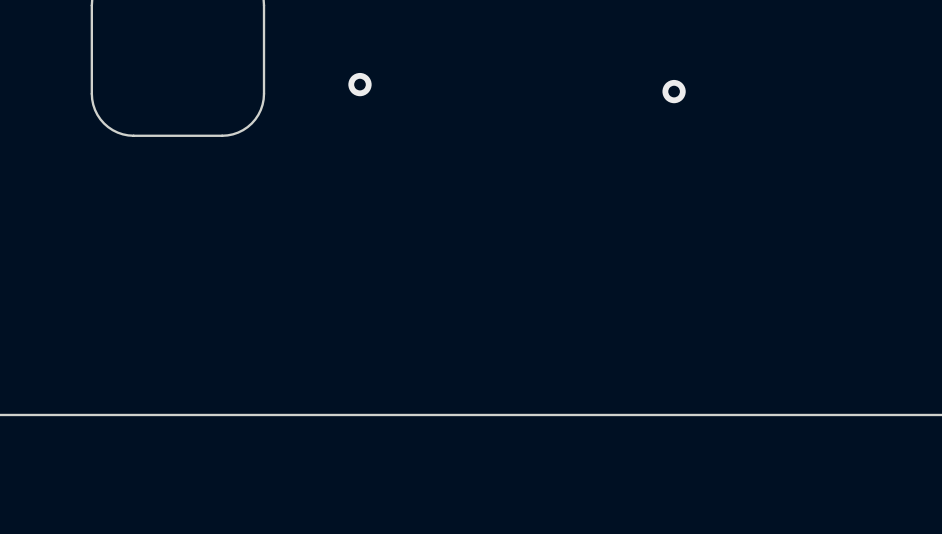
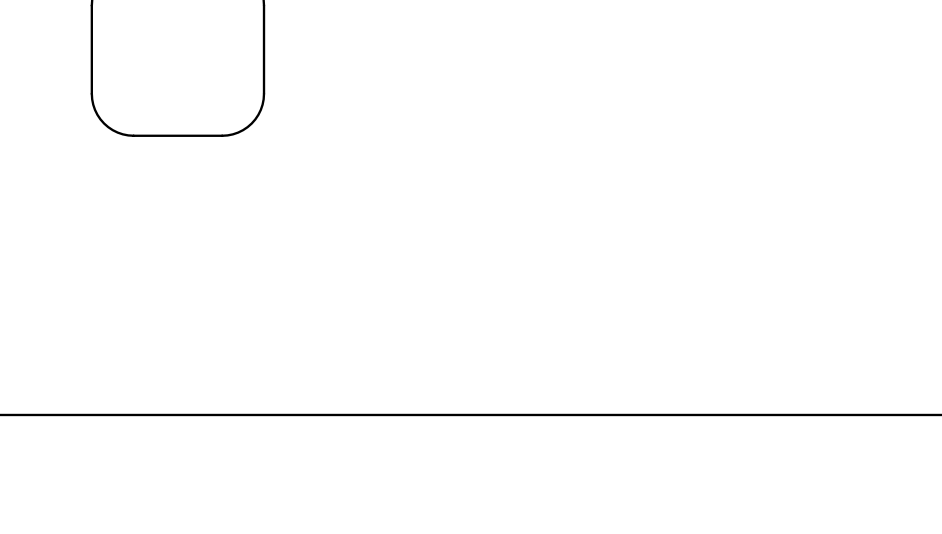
via: (359, 84) -> none
via: (674, 91) -> none

